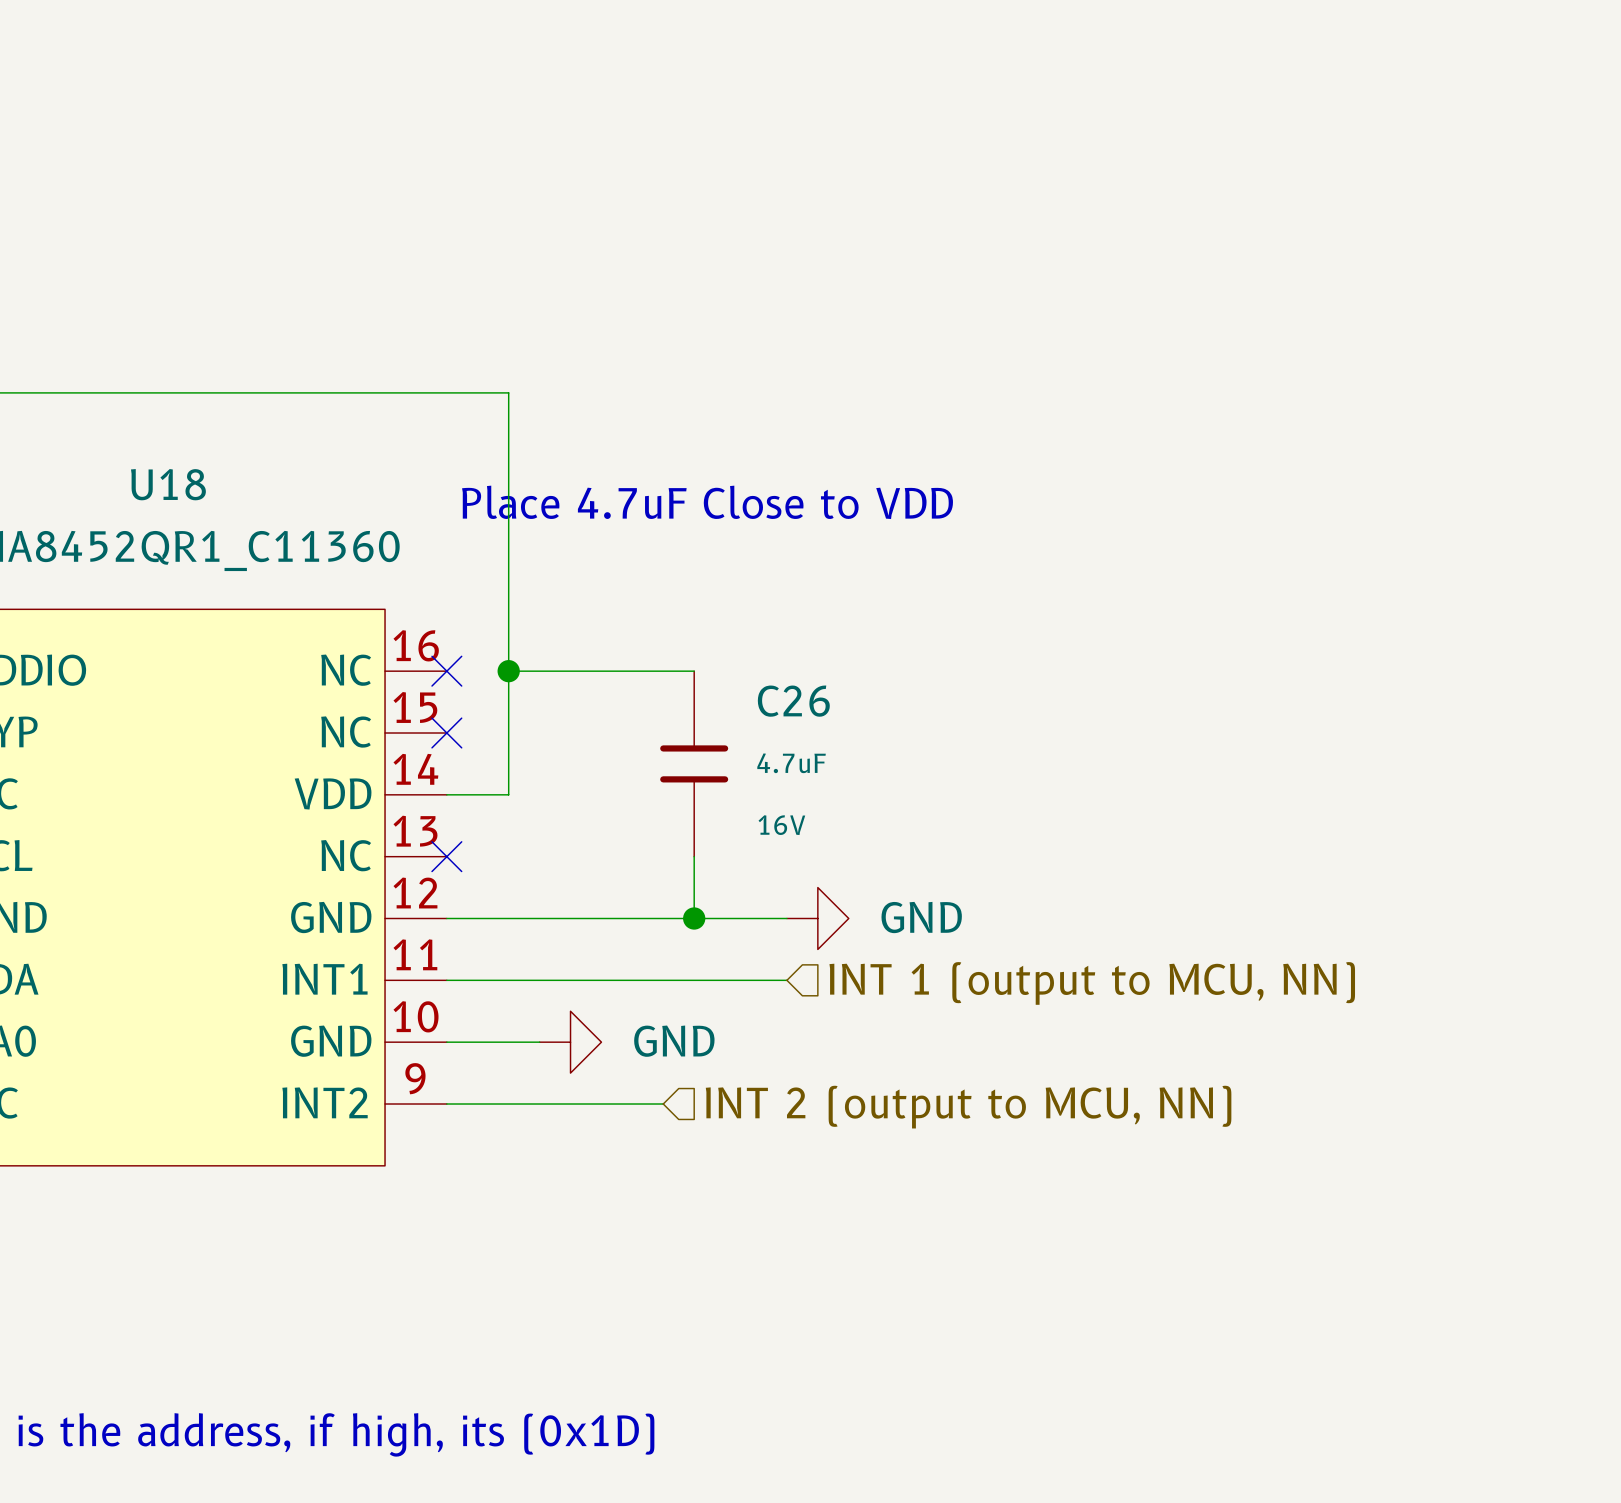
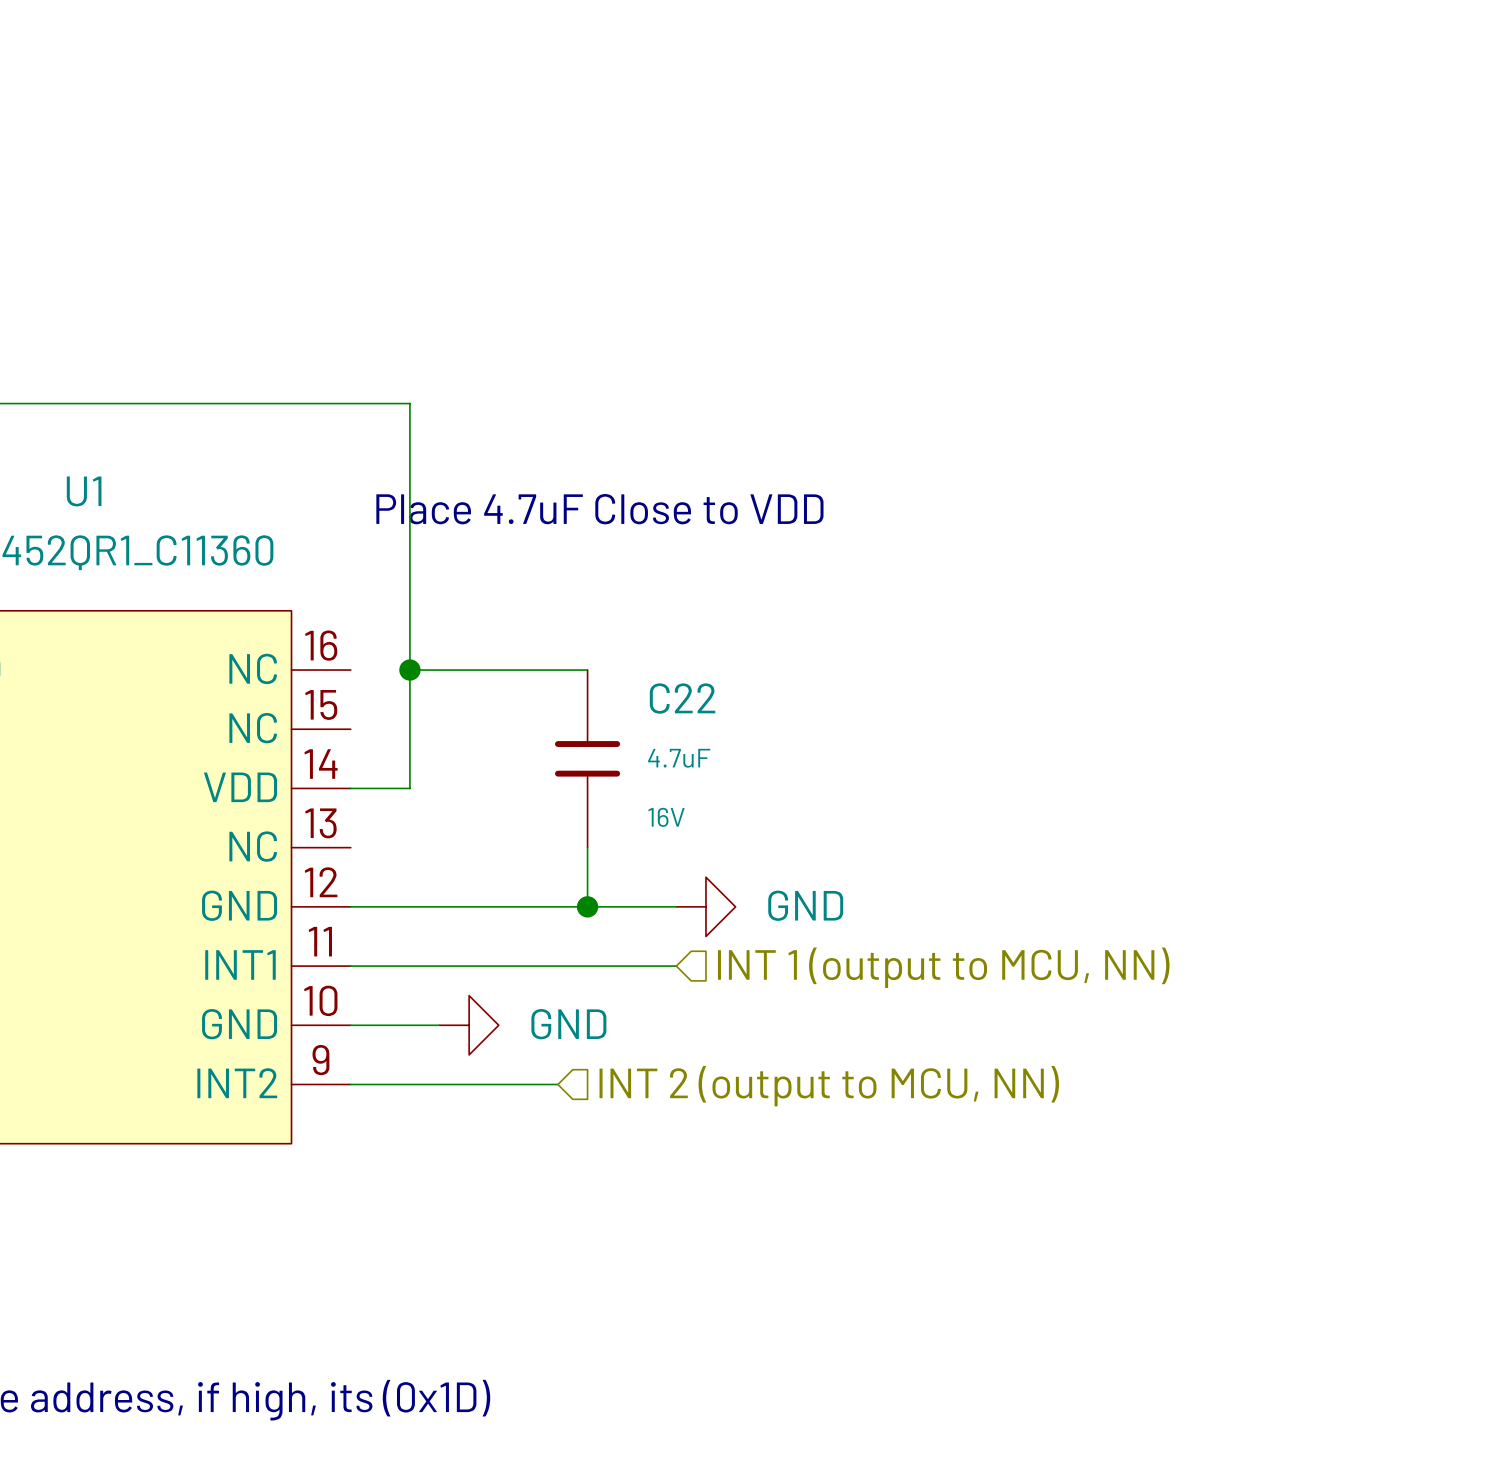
U18 name: U18 (168, 484) -> U1 (84, 491)
no-connect mark: (446, 671) -> none
C26 name: C26 (793, 701) -> C22 (682, 698)
no-connect mark: (446, 733) -> none
no-connect mark: (446, 856) -> none

